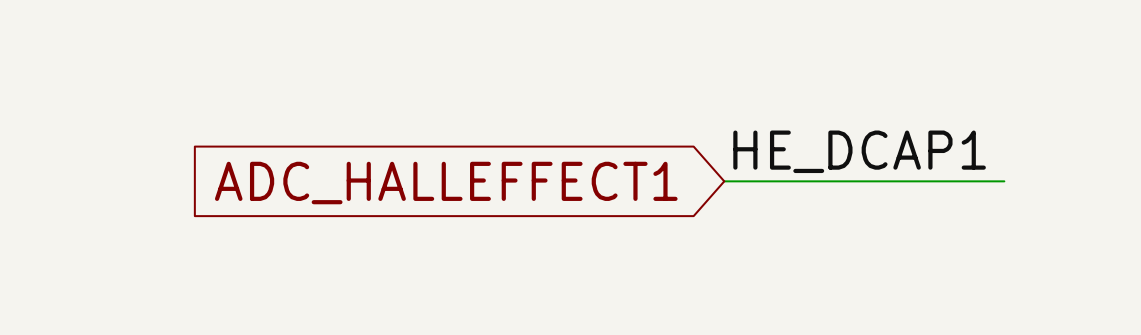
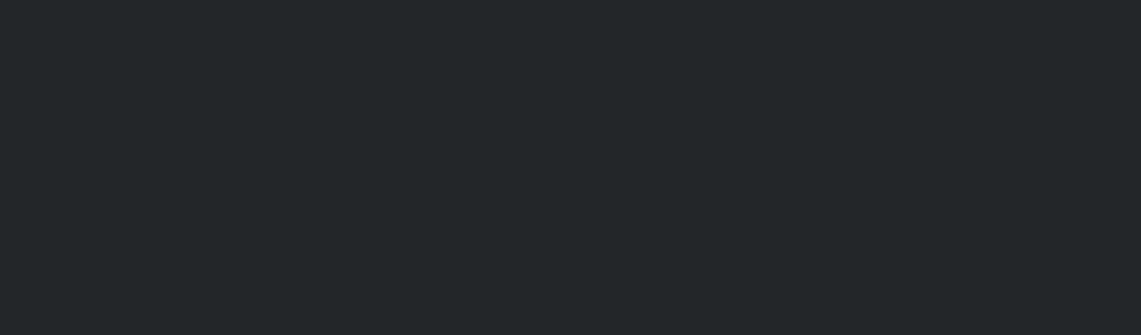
label: HE_DCAP1 (859, 151) -> none
wire: (724, 181) (1004, 181) -> none
global label: ADC_HALLEFFECT1 (446, 183) -> none

